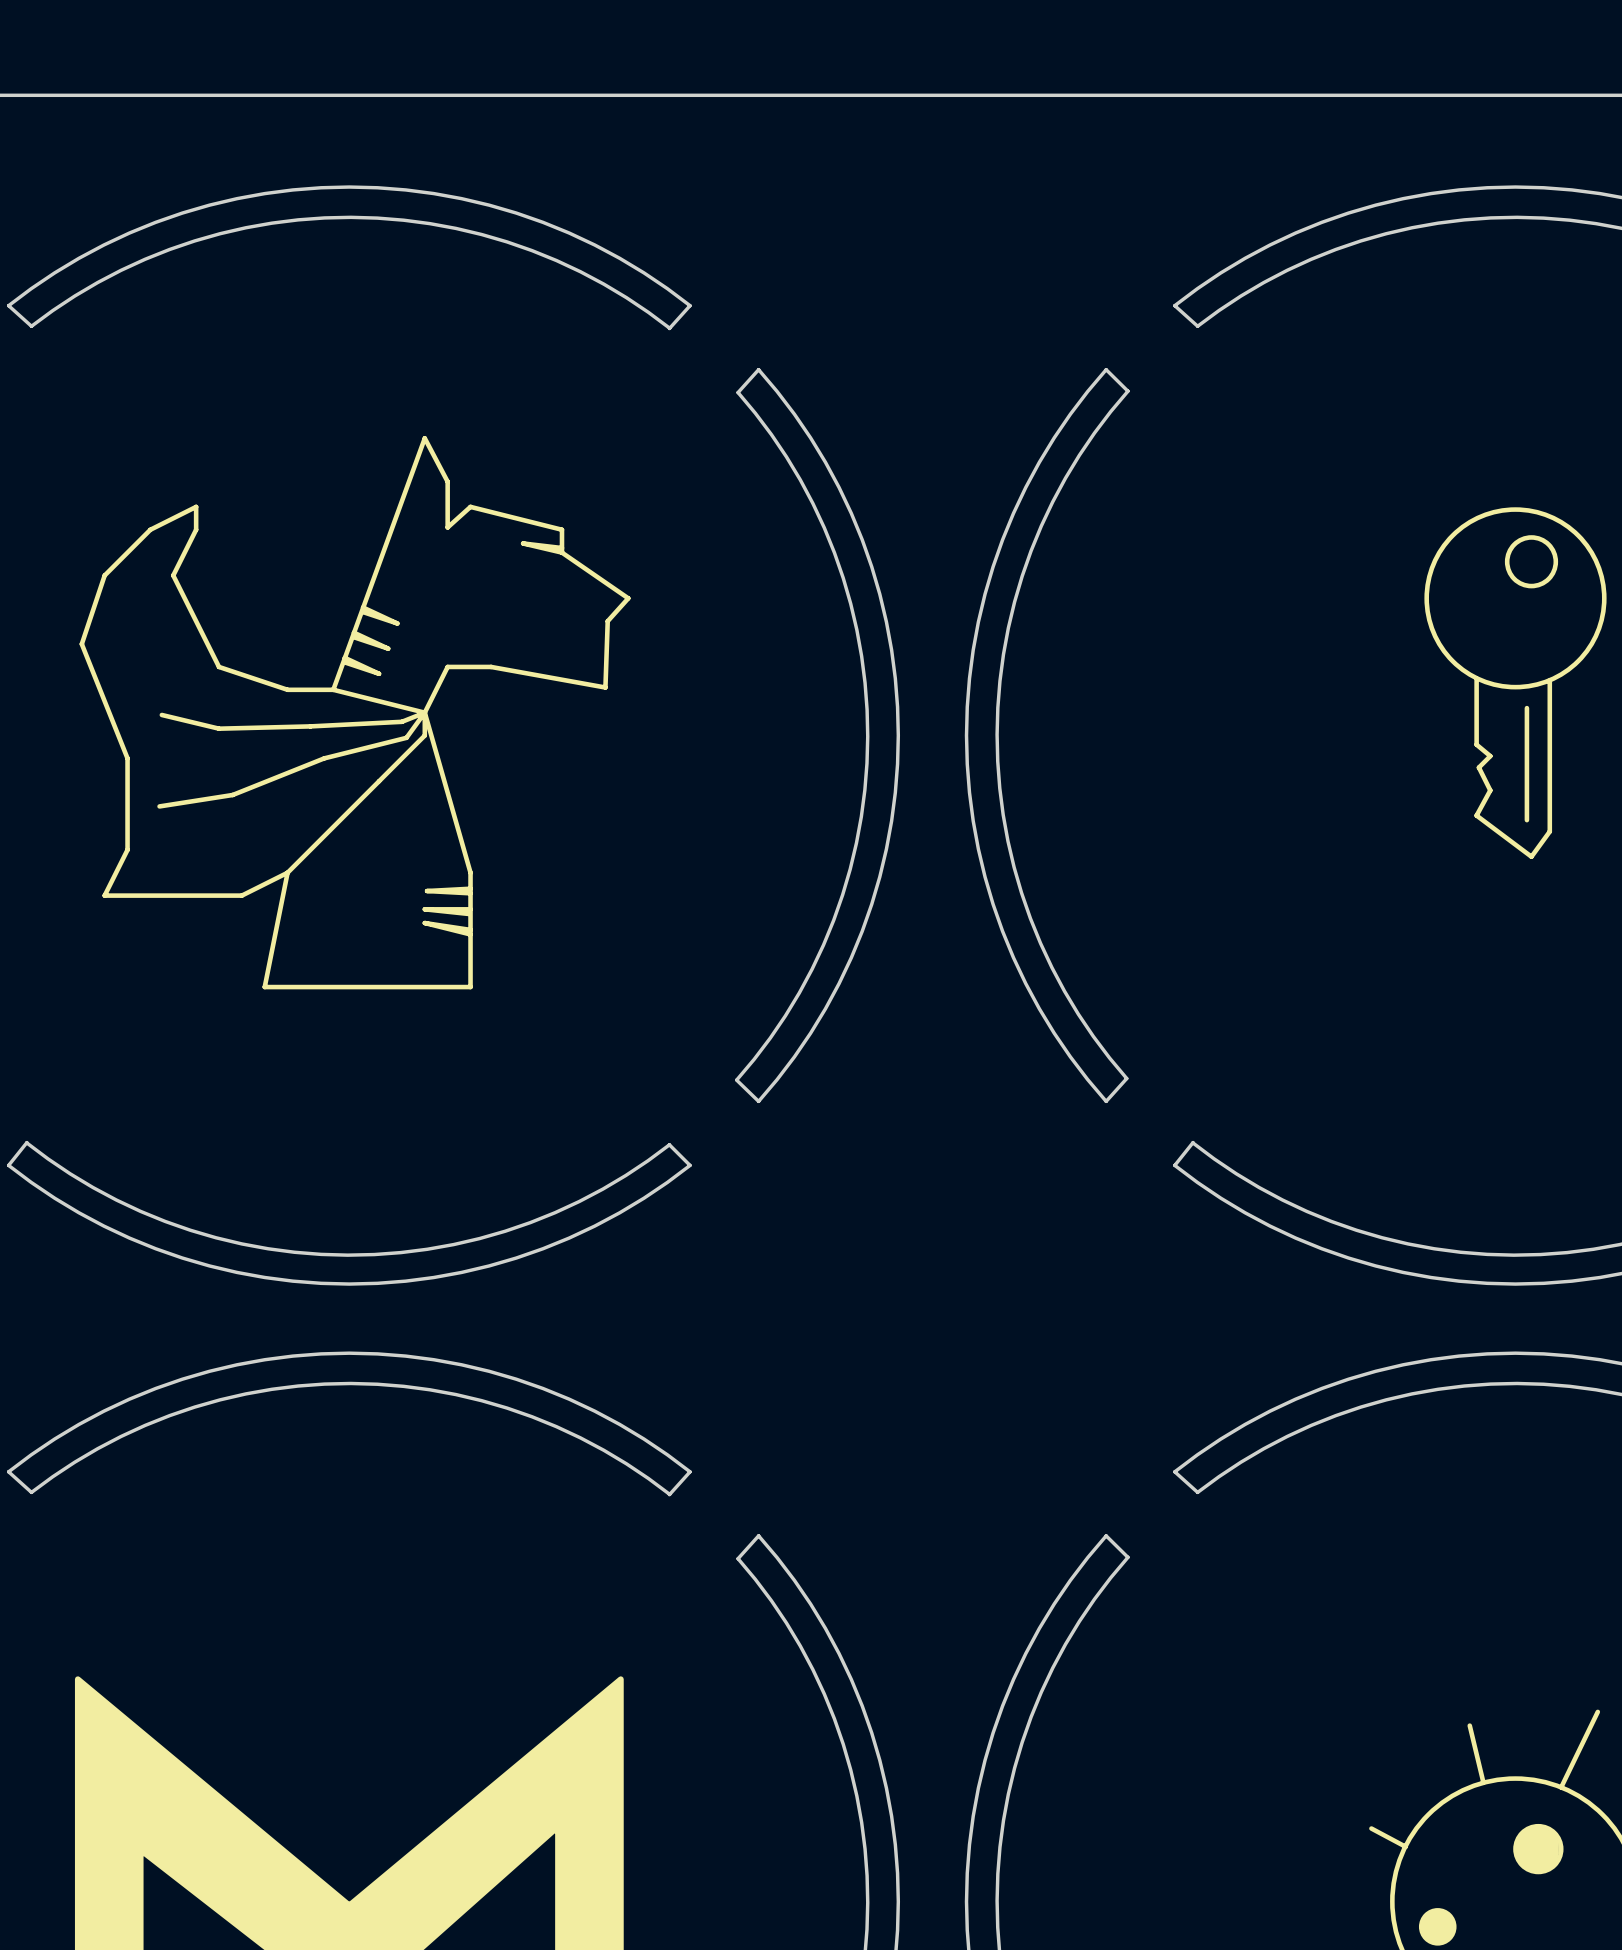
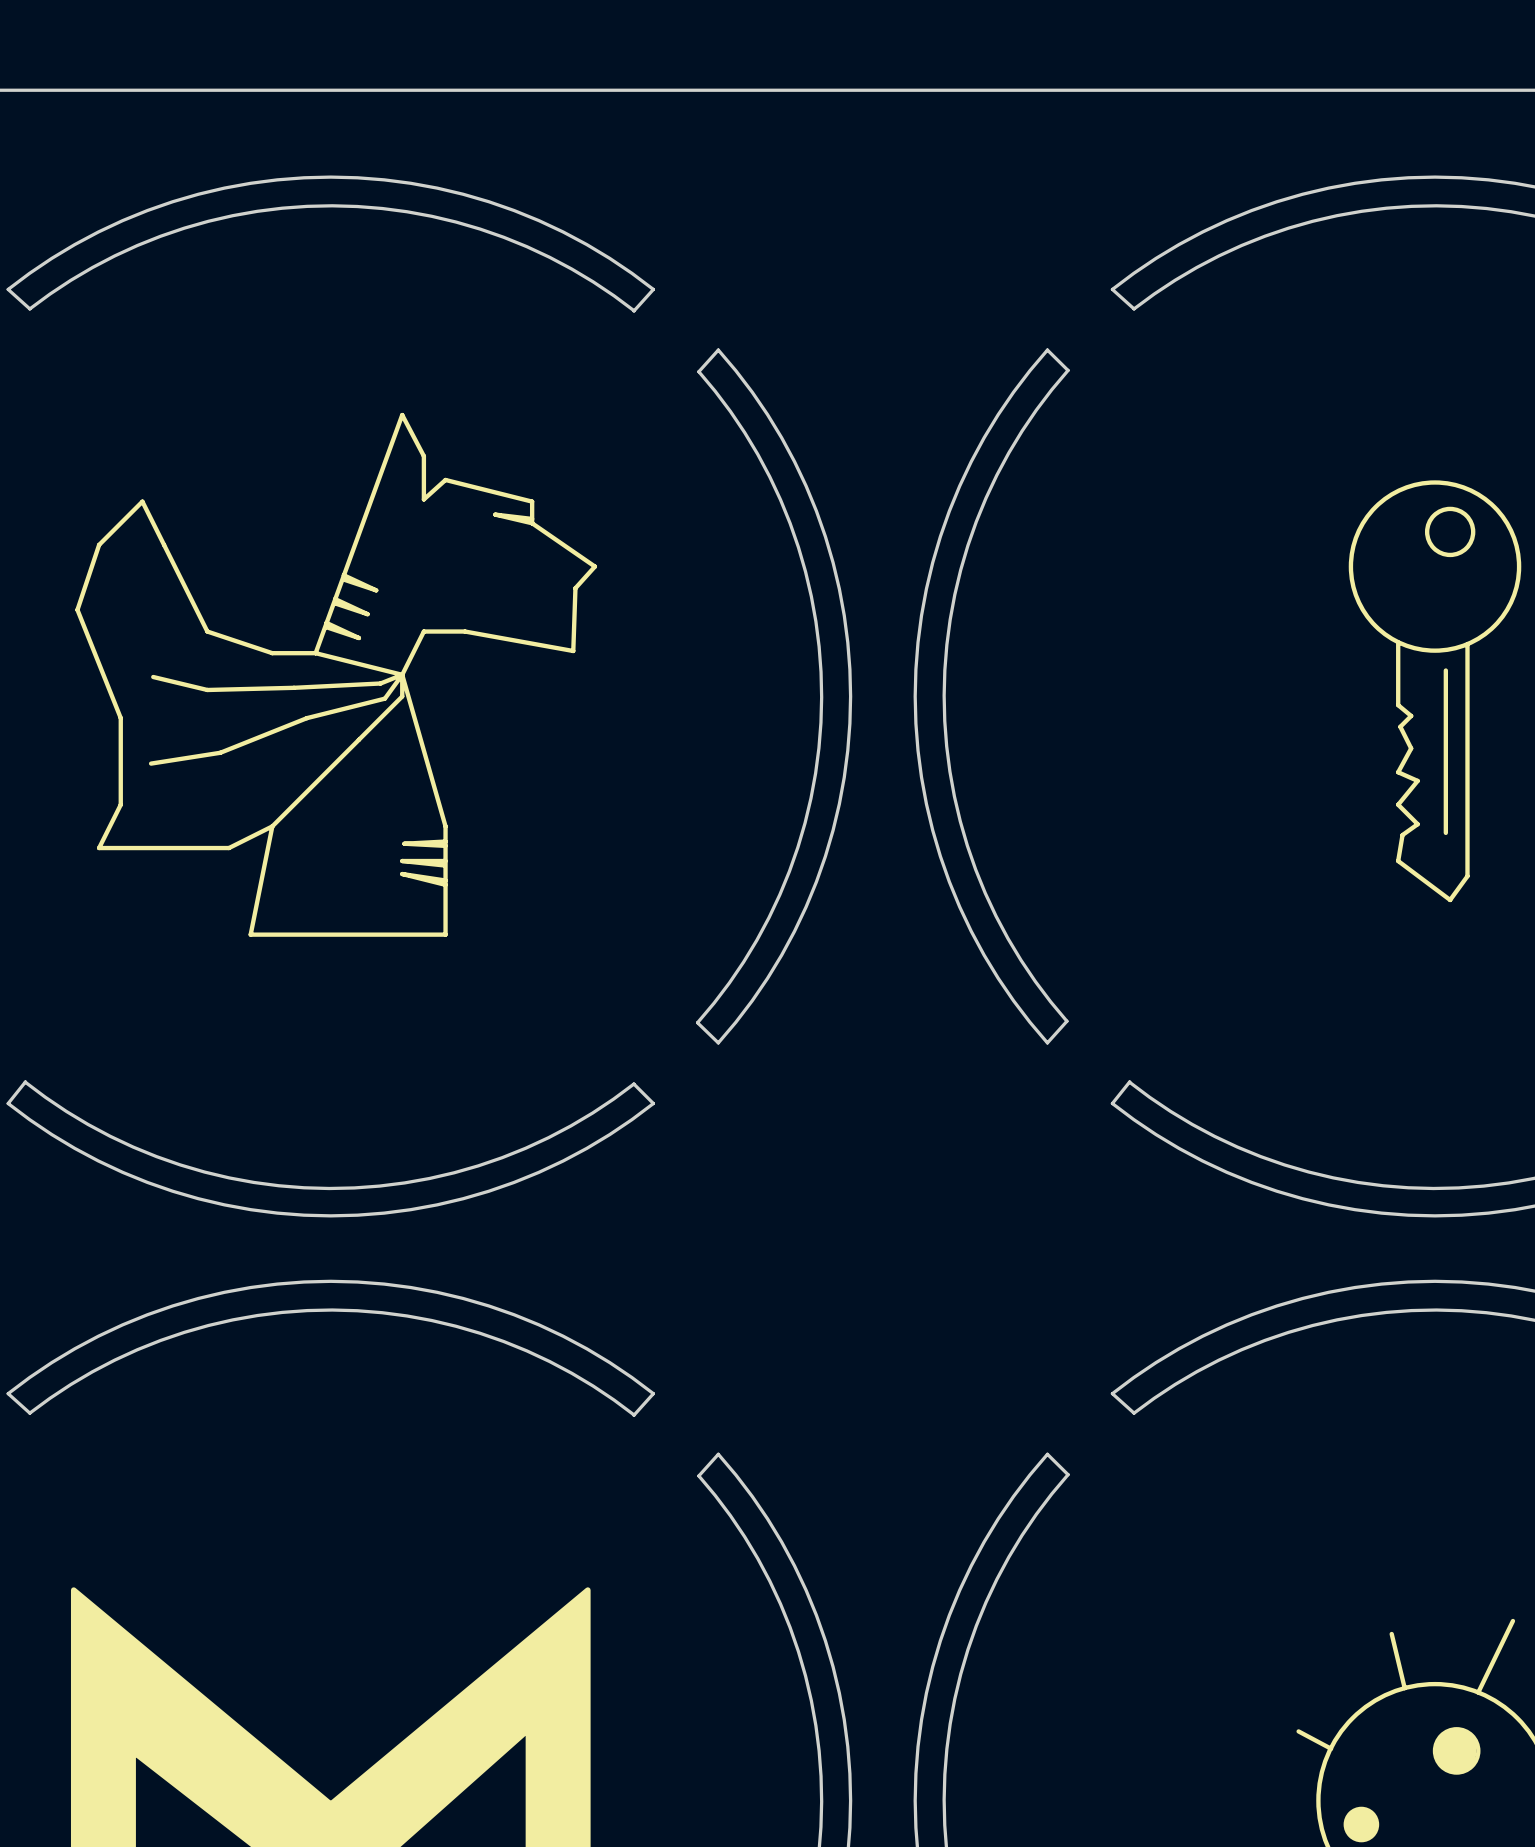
line: (150, 529) (196, 506) (196, 529) (173, 575) -> (142, 501) (164, 544)
line: (1476, 815) (1531, 856) (1549, 831) -> (1398, 772) (1417, 780) (1398, 804) (1417, 824) (1402, 835) (1398, 861) (1450, 900) (1467, 876) (1467, 787)
line: none -> (1445, 776) (1445, 832)

